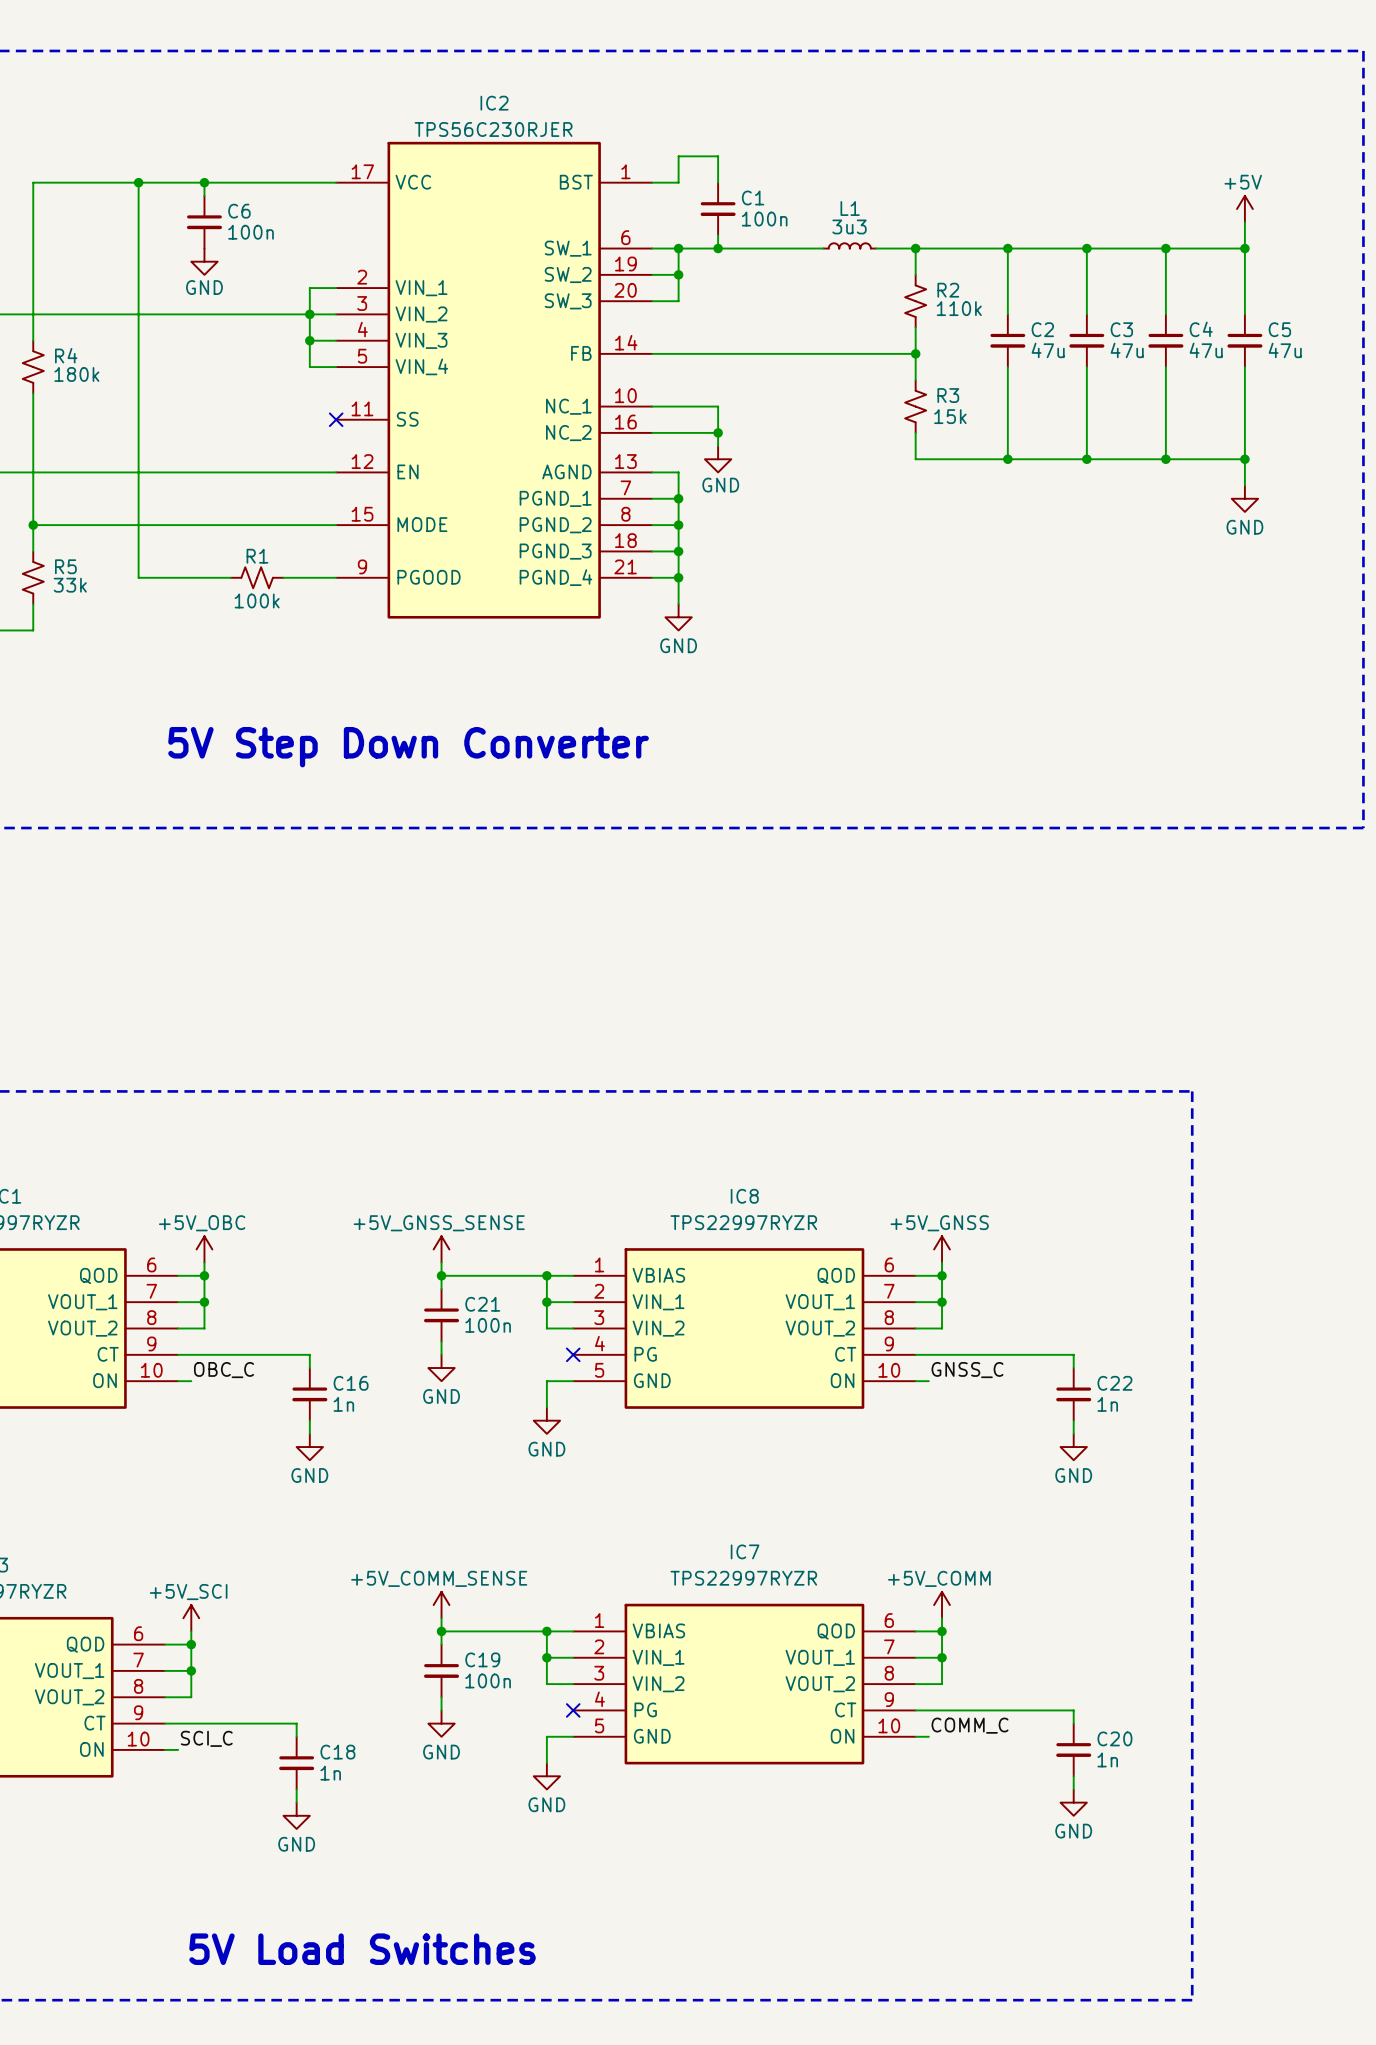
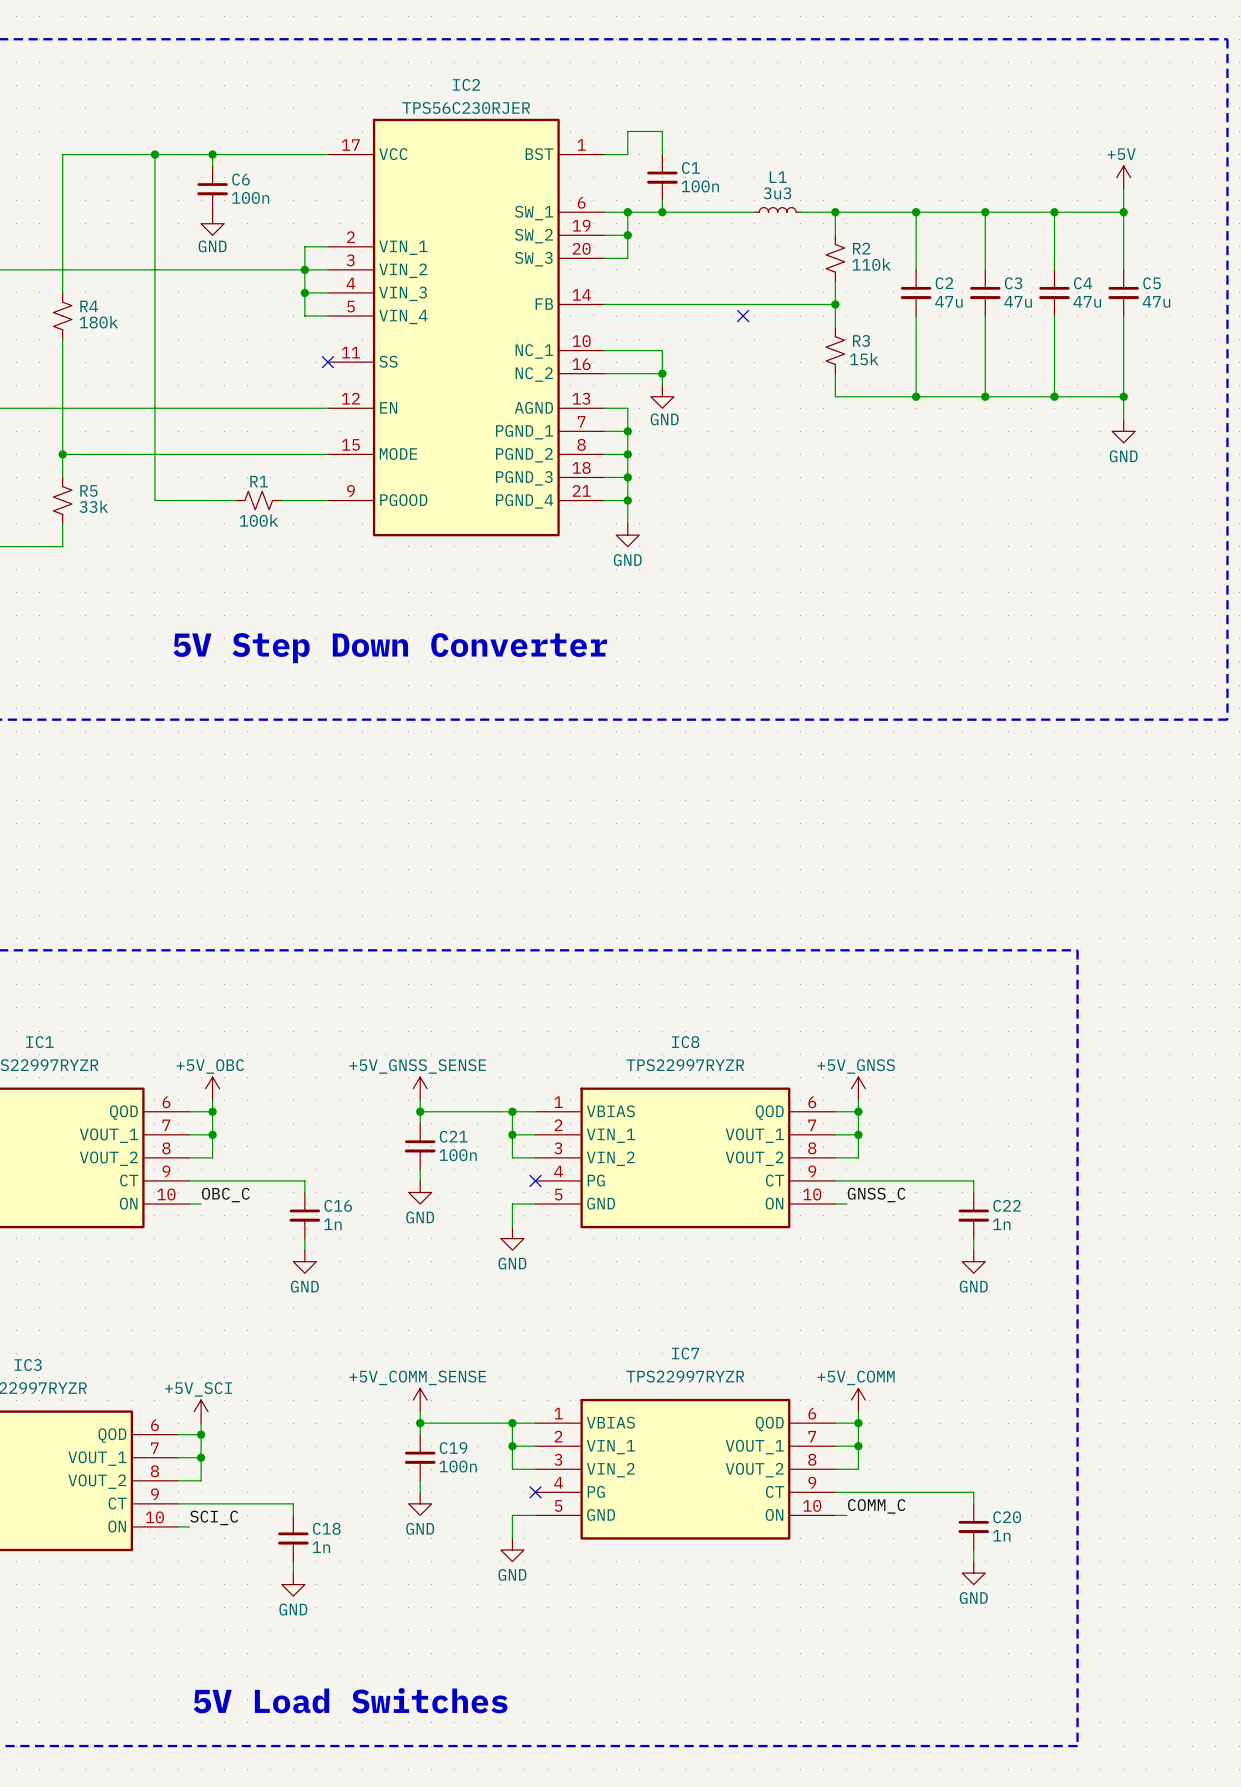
no-connect mark: none -> (743, 316)

